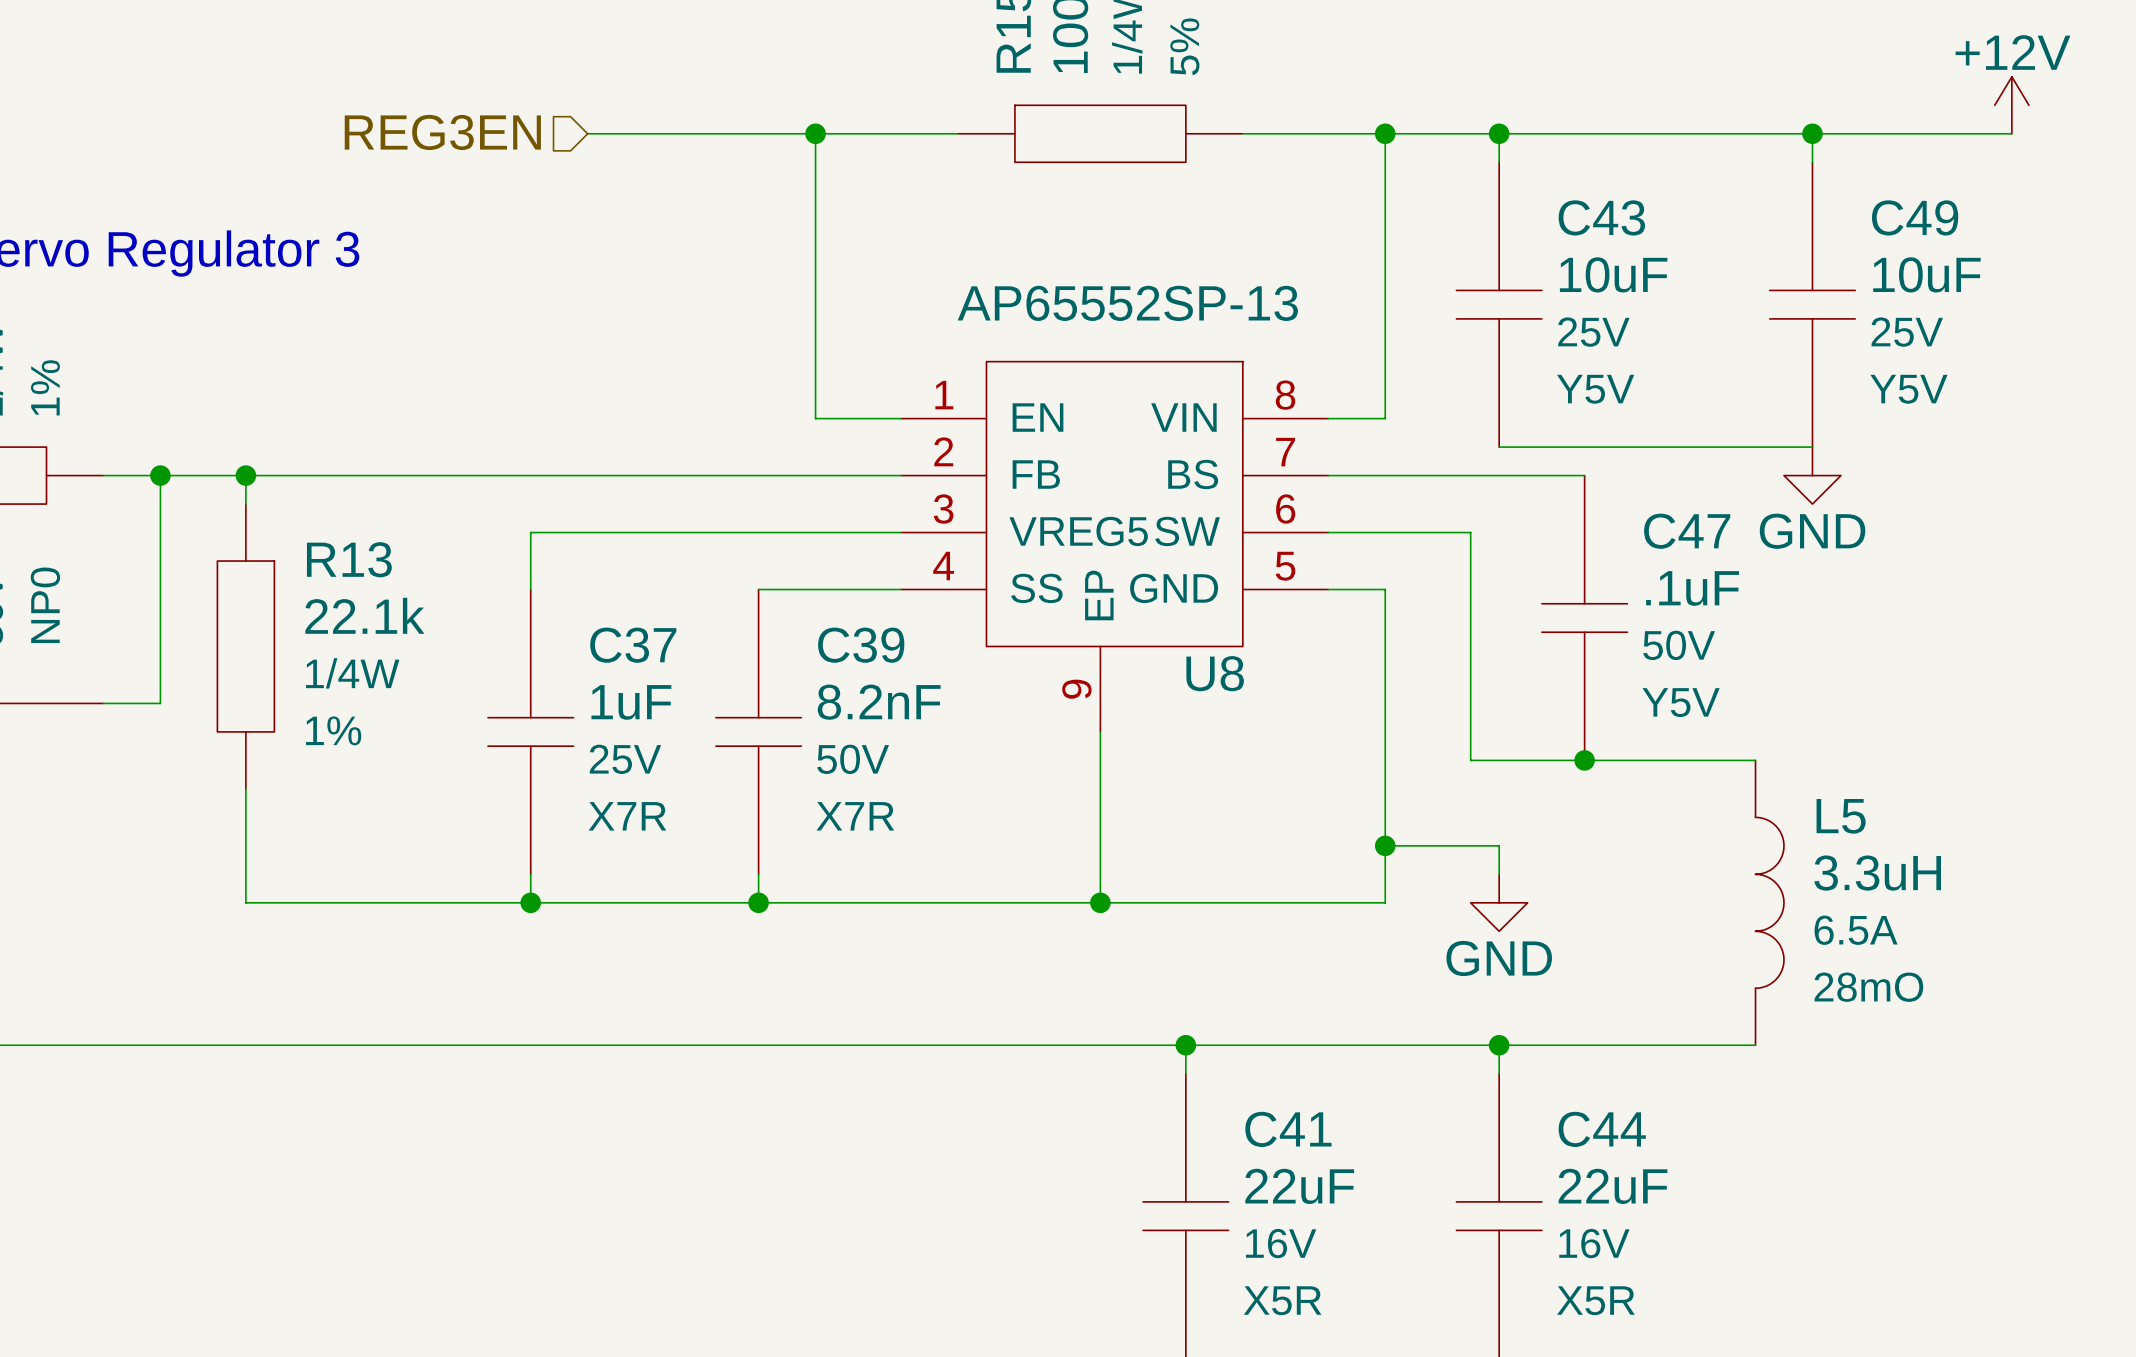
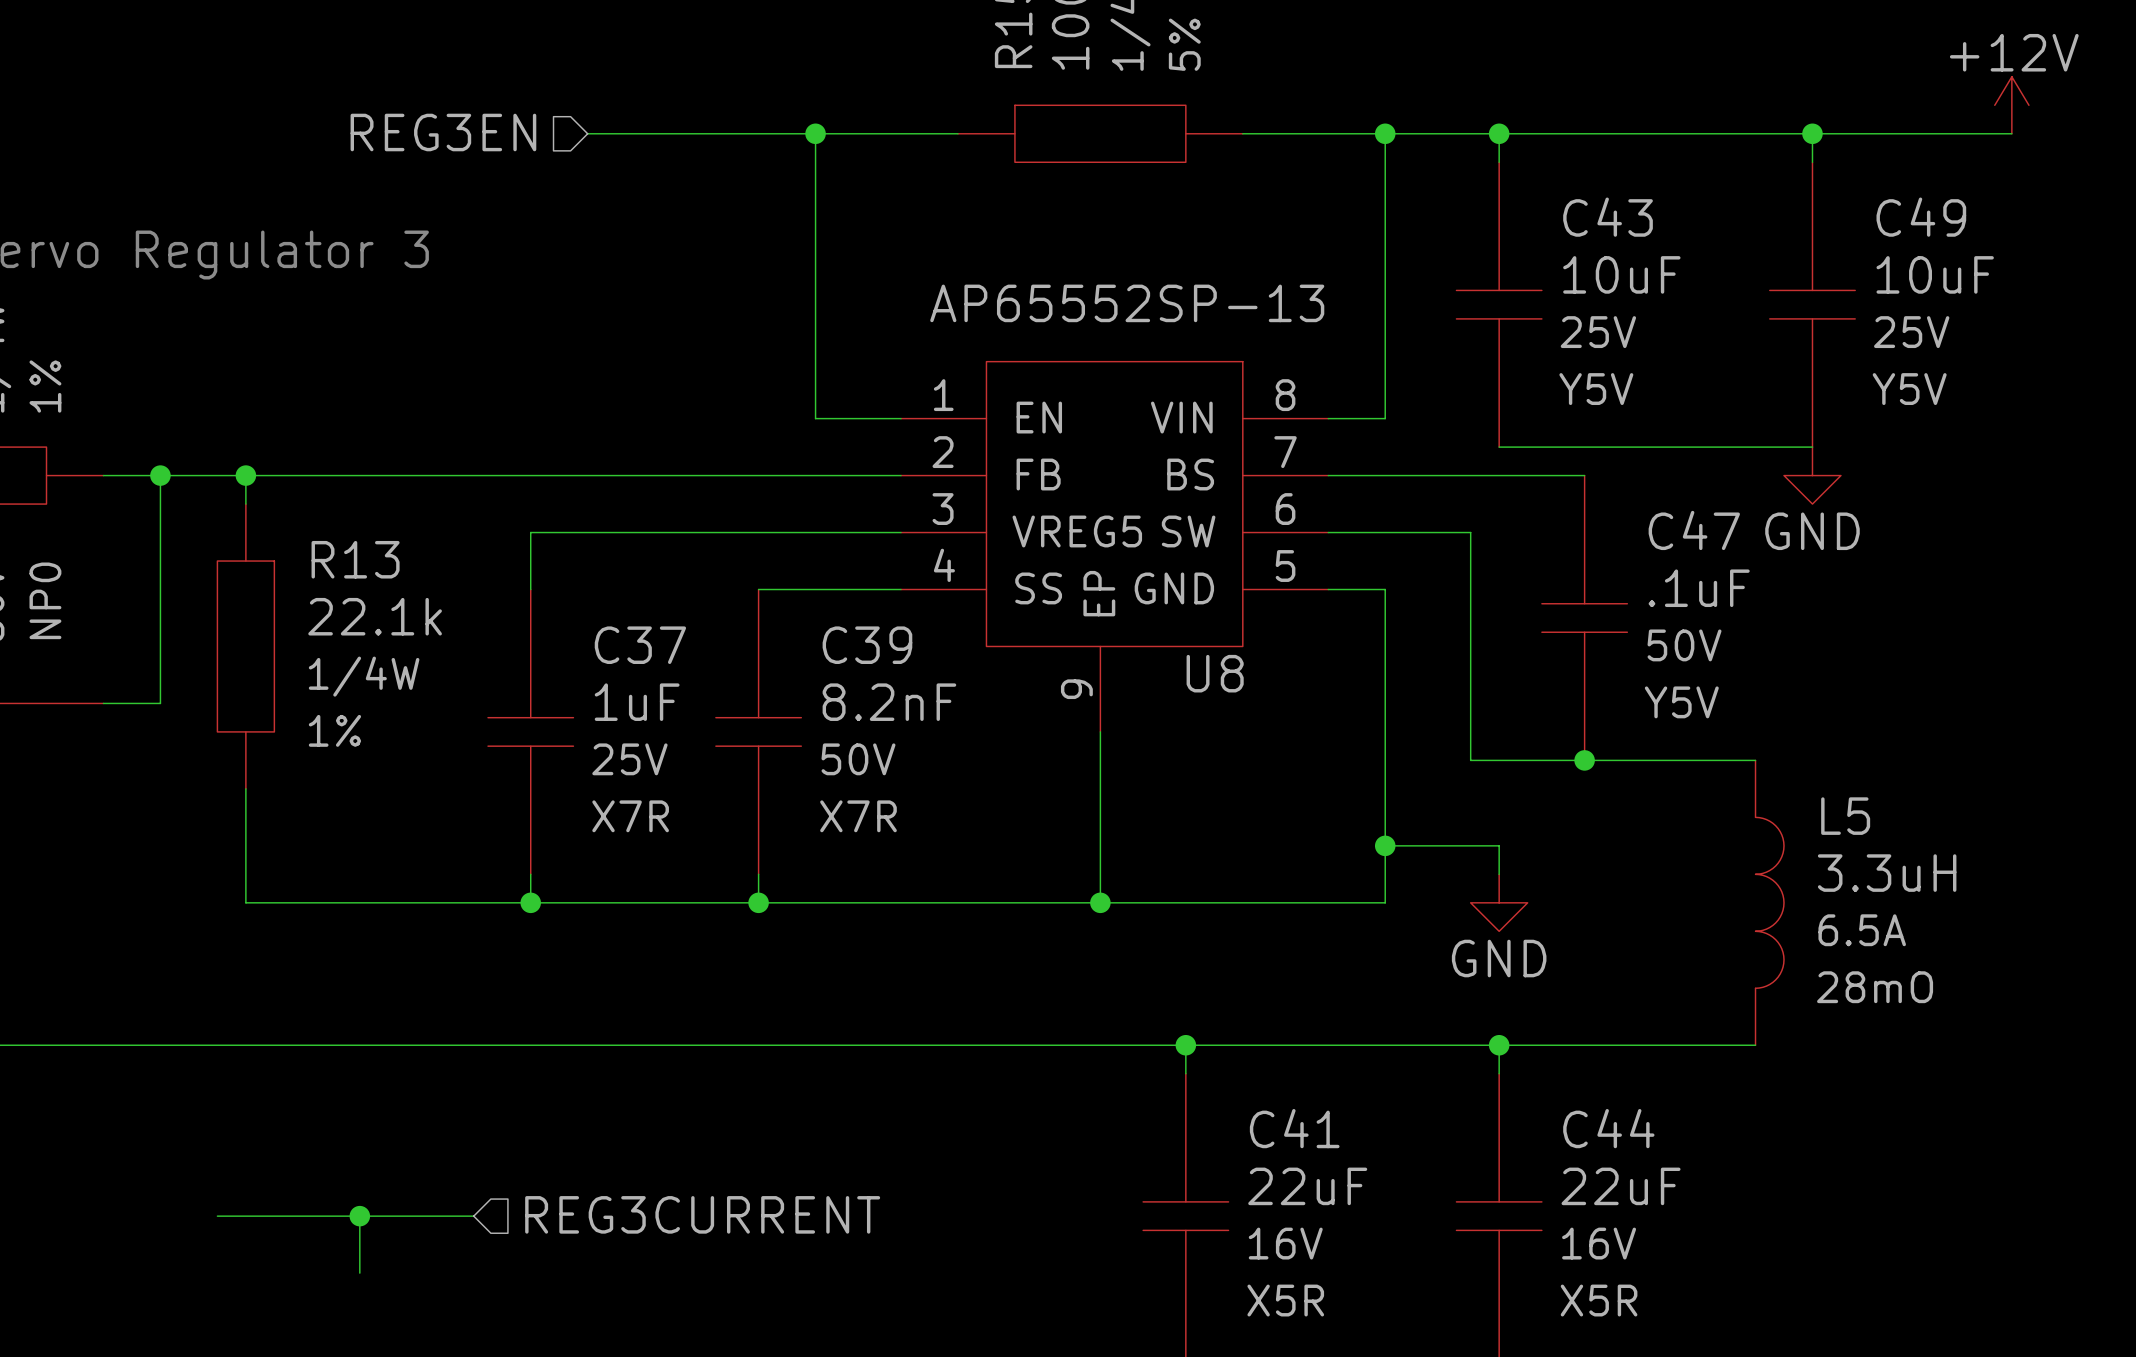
hierarchical label: none -> REG3CURRENT (702, 1214)
wire: none -> (217, 1216) (473, 1216)
wire: none -> (359, 1216) (359, 1273)
junction: none -> (359, 1216)

